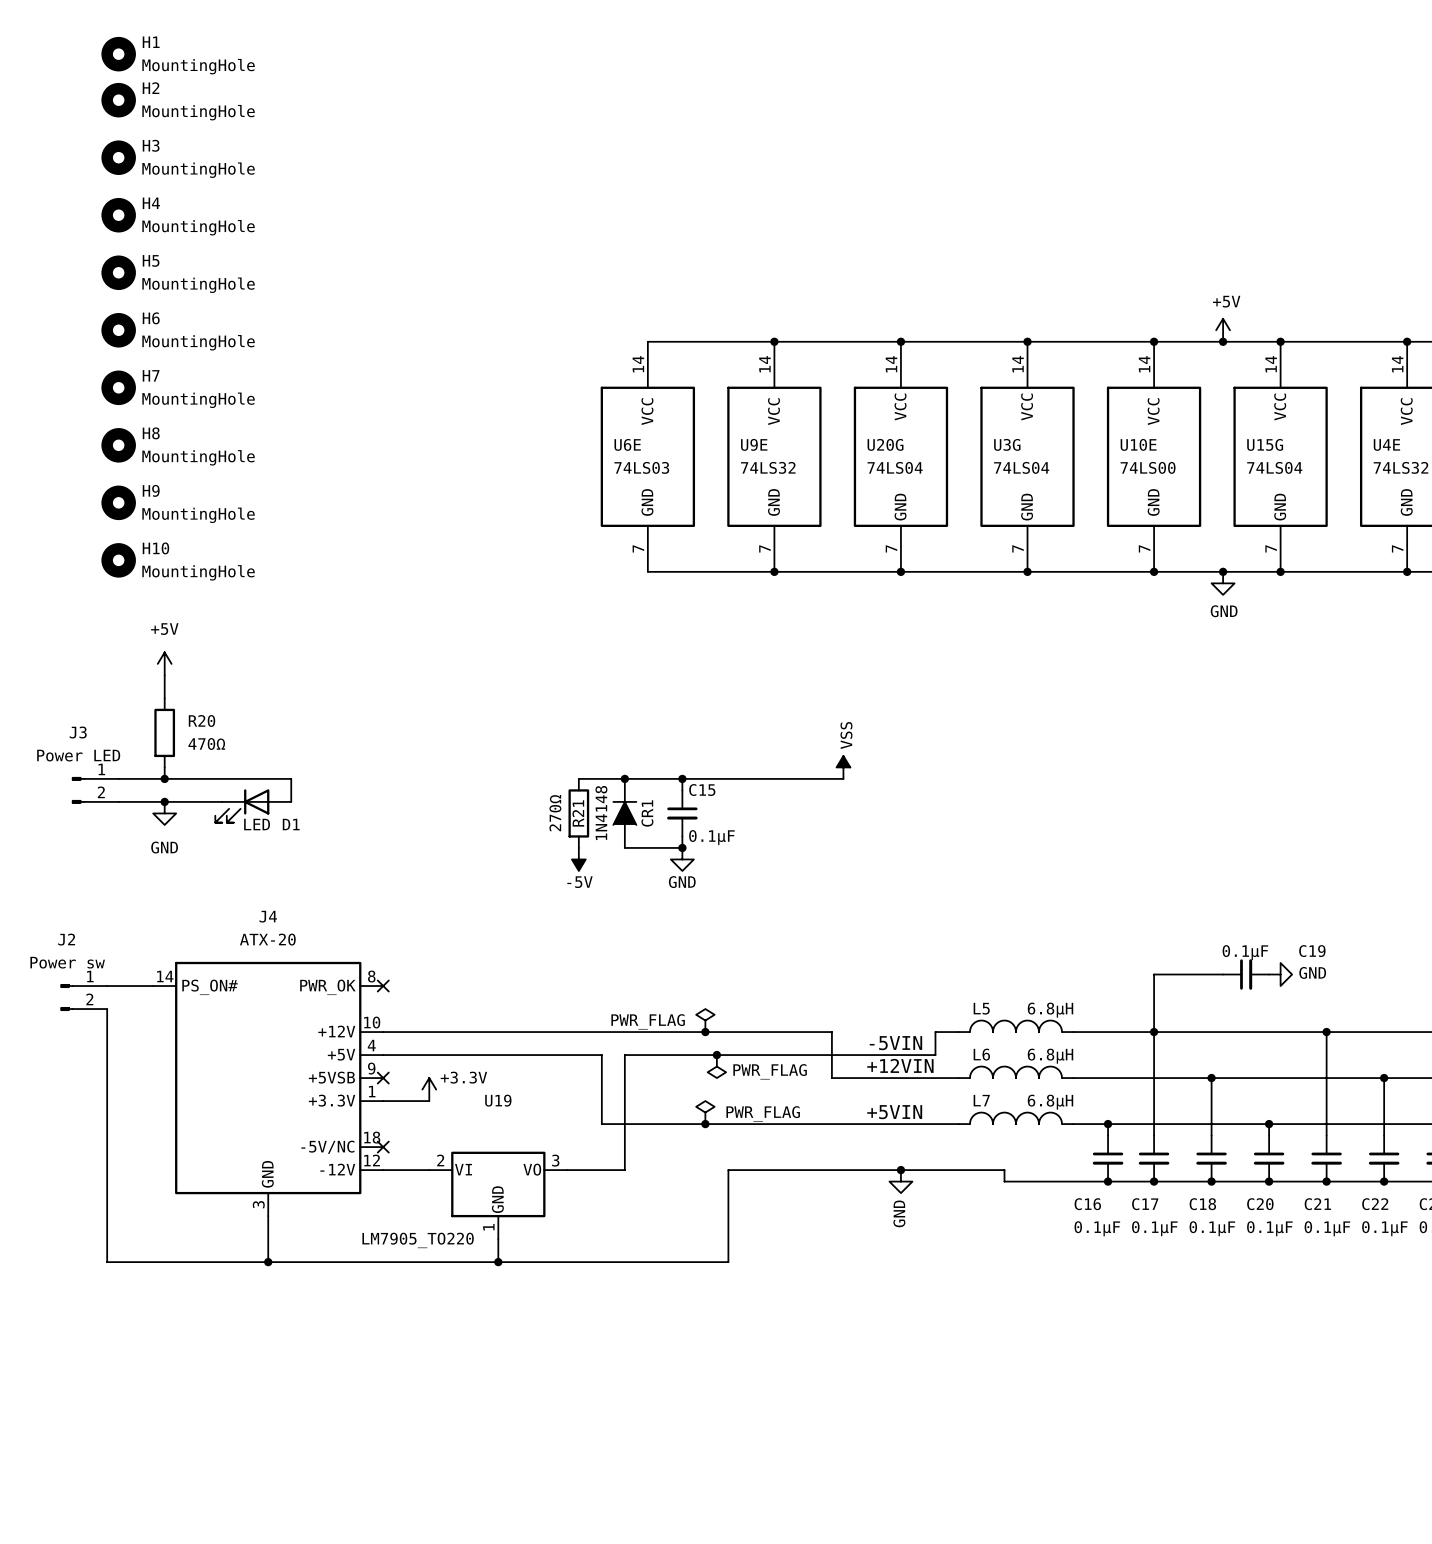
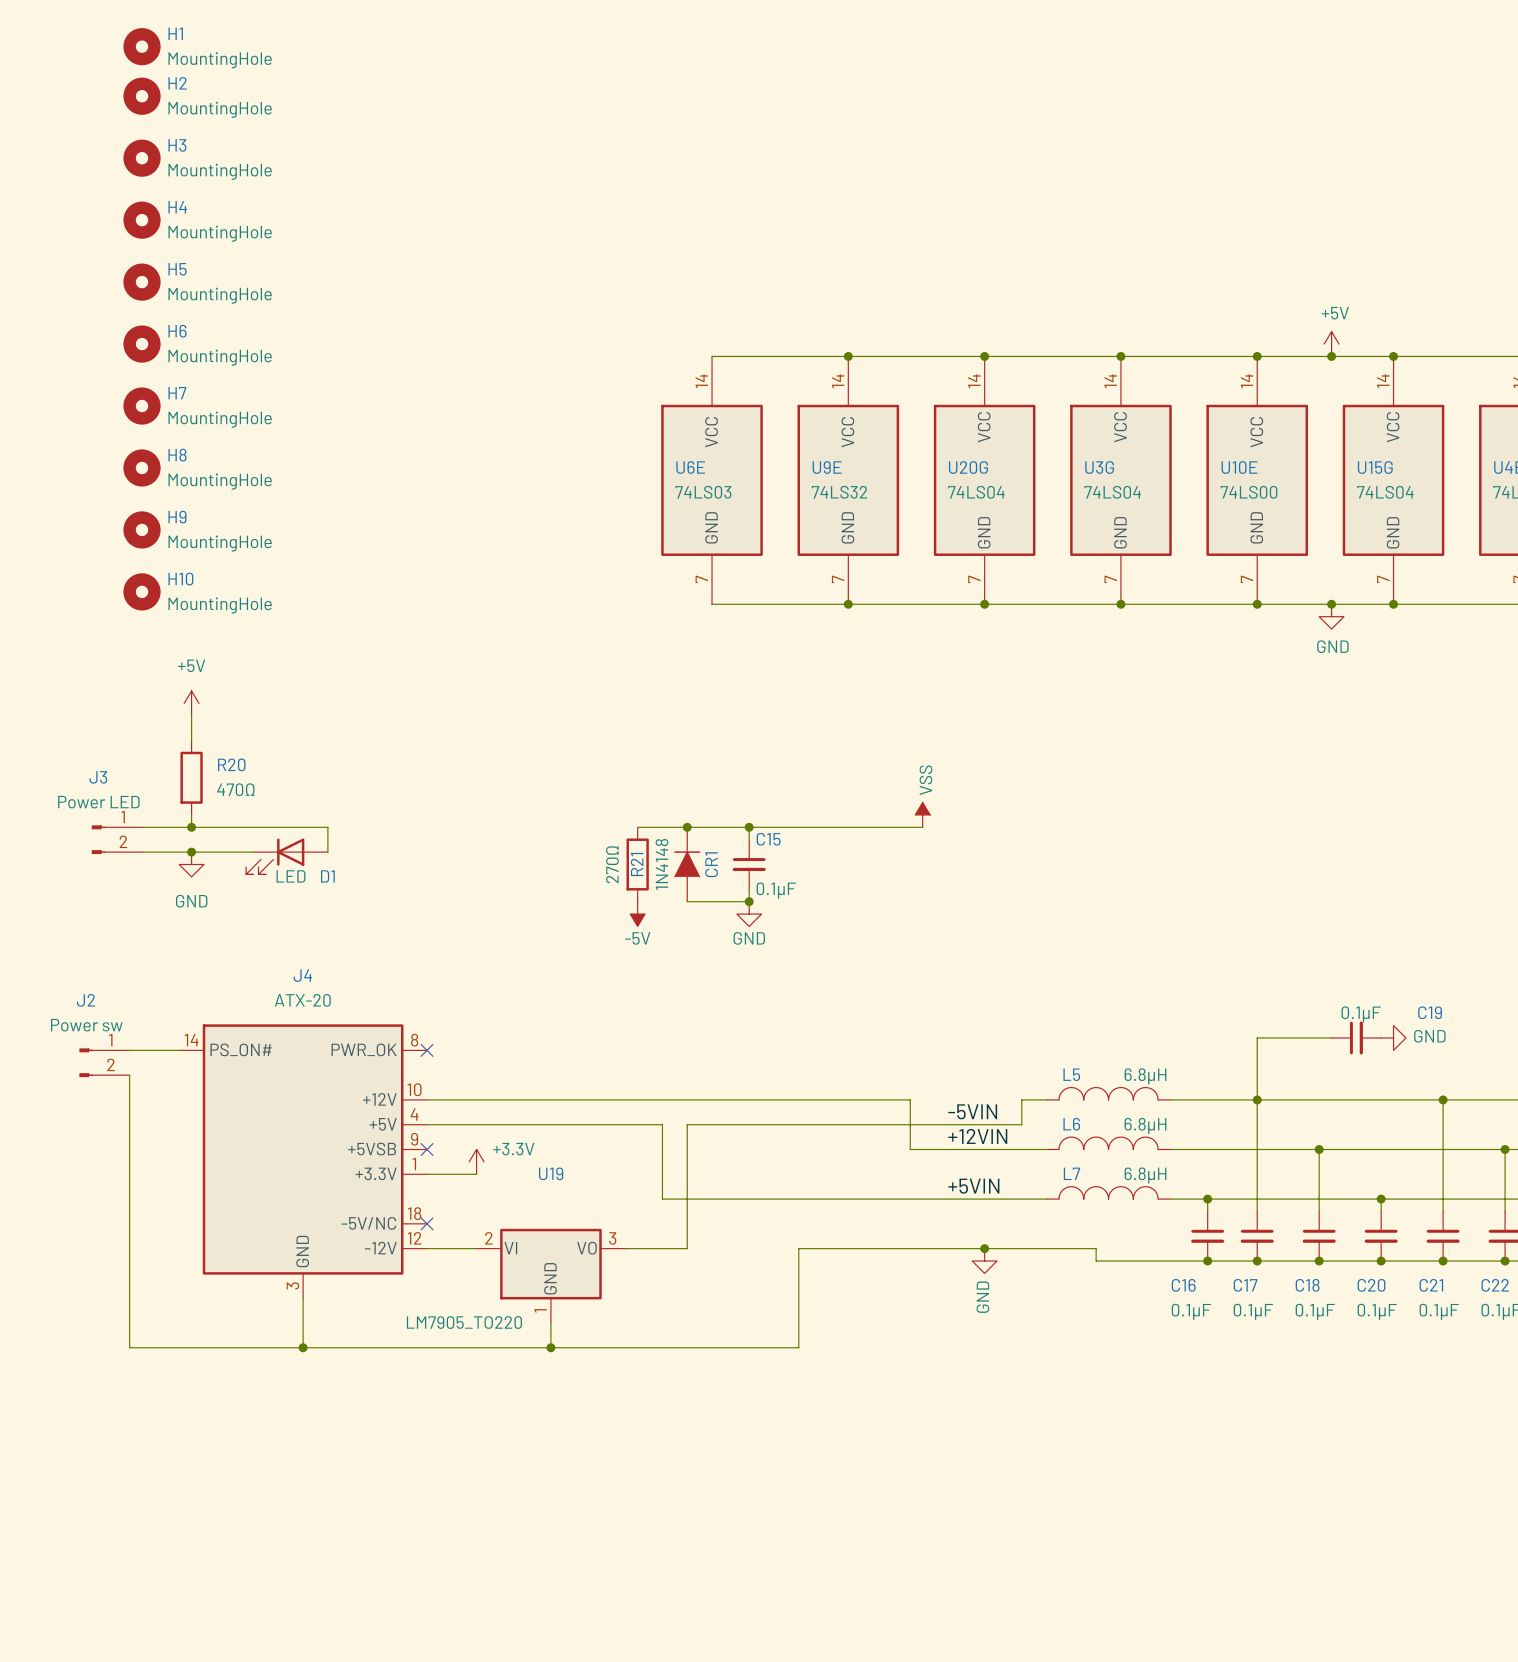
power symbol: PWR_FLAG (705, 1020) -> none
junction: (705, 1032) -> none
junction: (716, 1055) -> none
power symbol: PWR_FLAG (716, 1066) -> none
power symbol: PWR_FLAG (705, 1112) -> none
junction: (705, 1124) -> none

